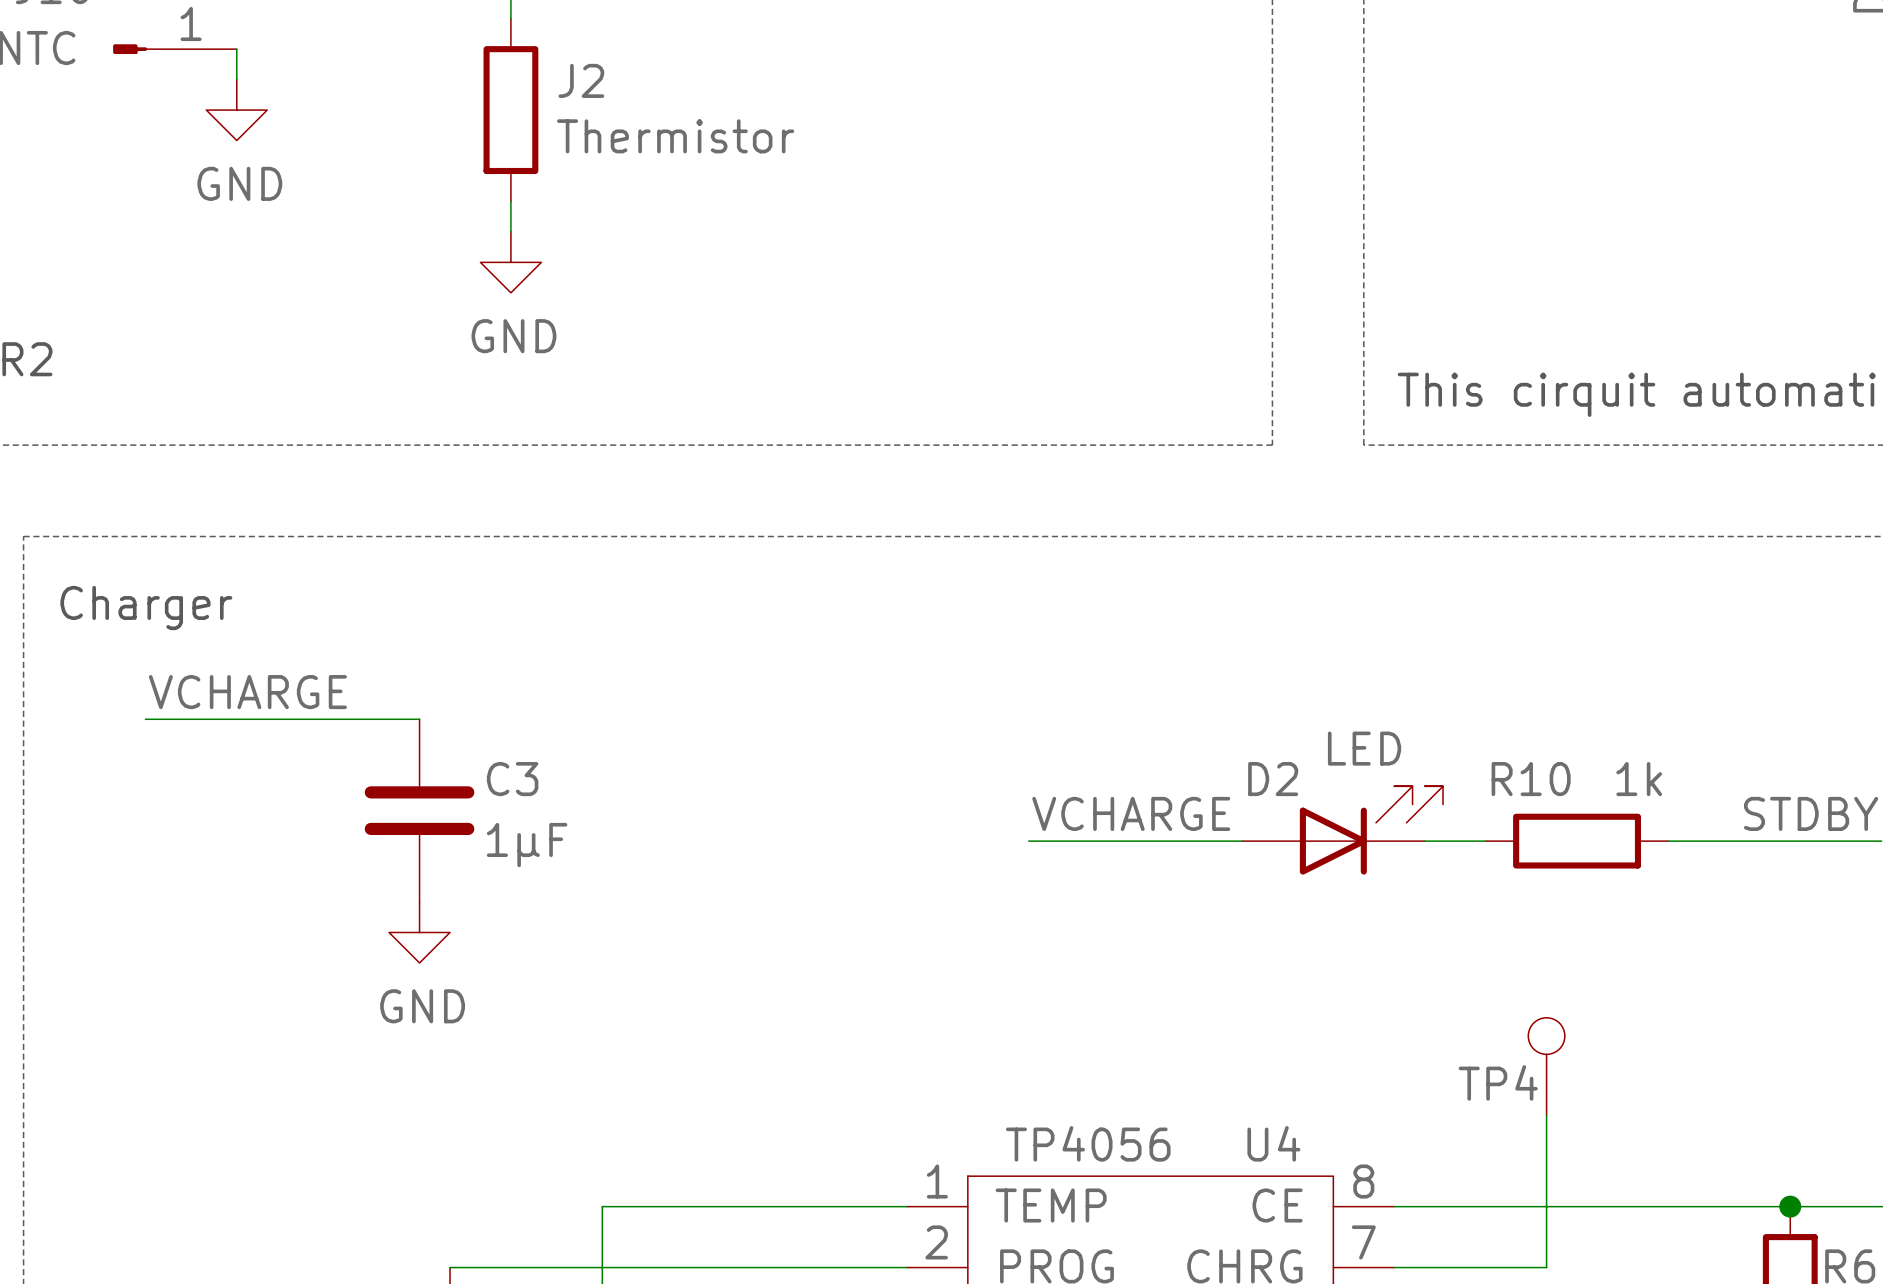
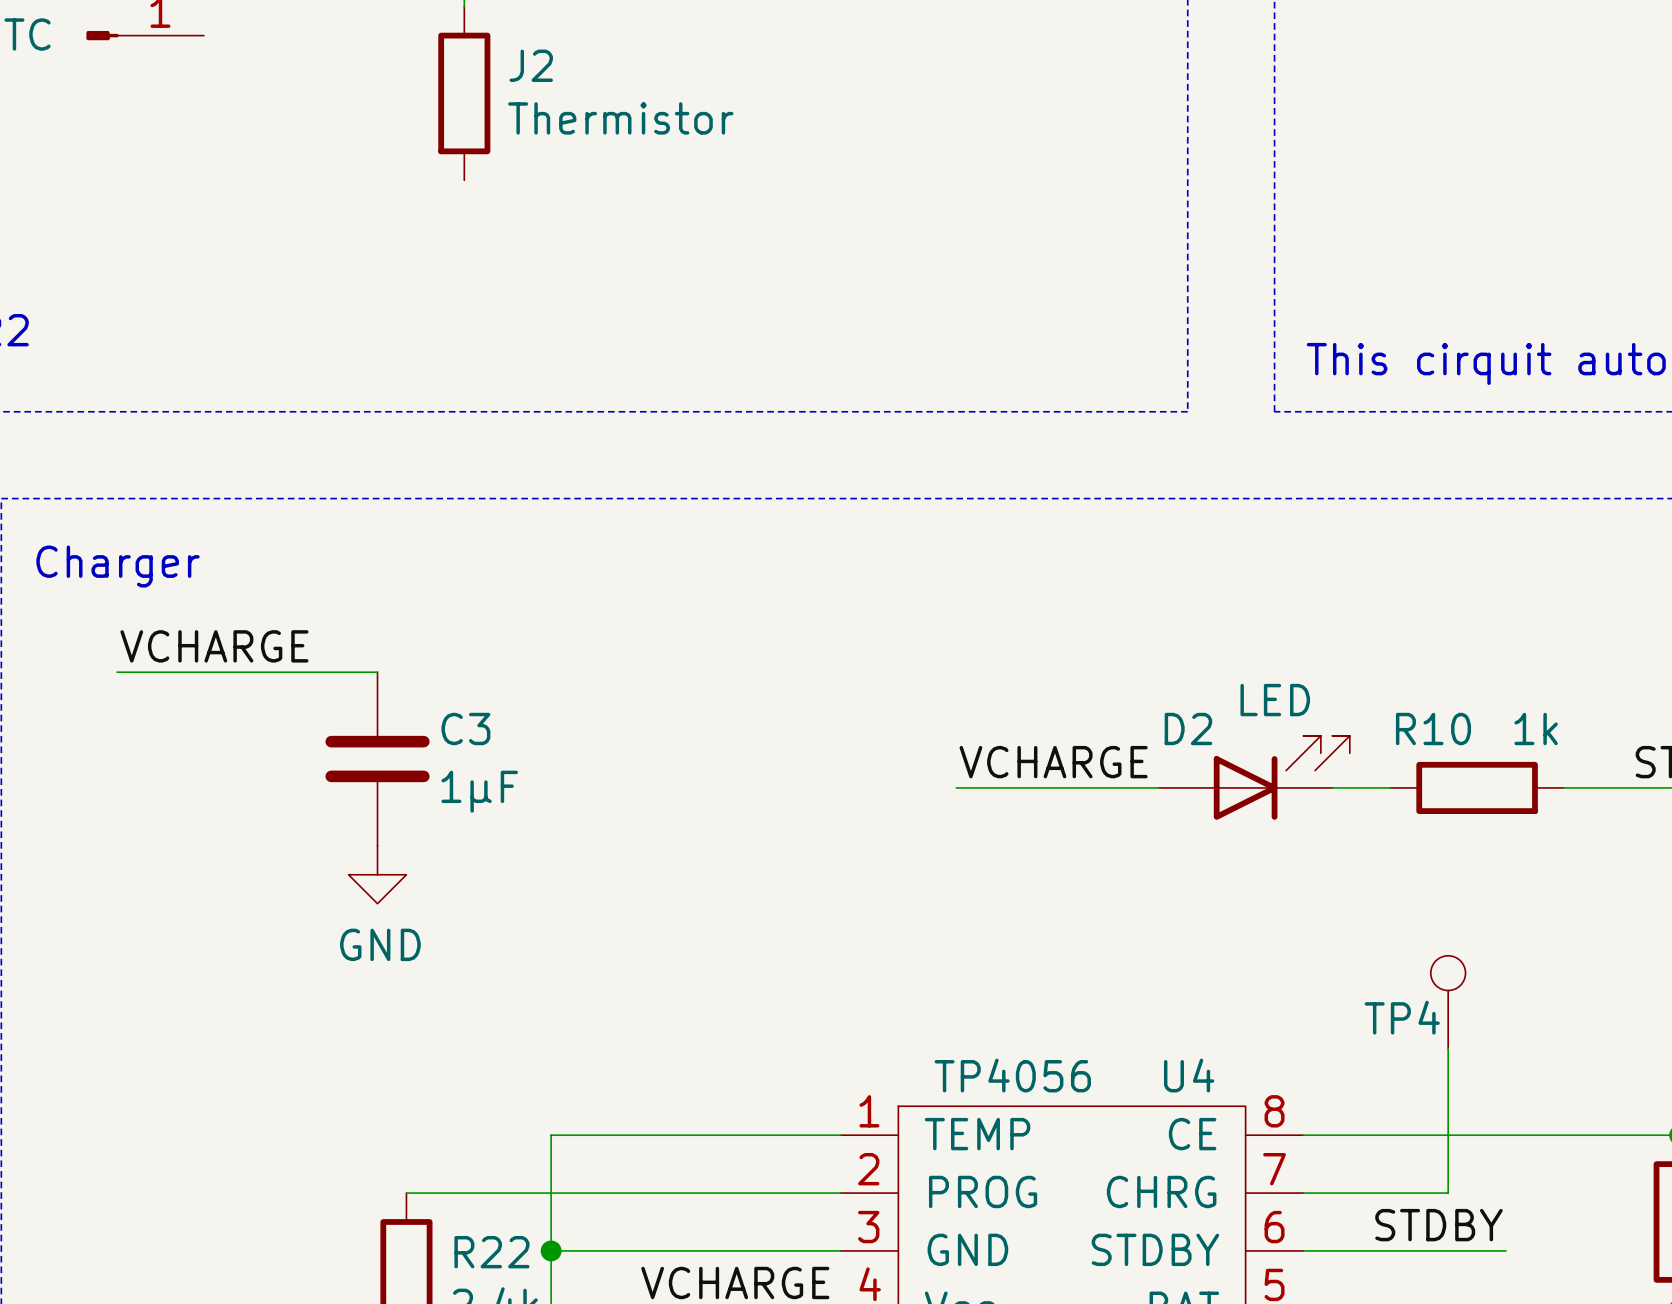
wire: (236, 49) (236, 79) -> none
power symbol: GND (236, 110) -> none
wire: (510, 201) (510, 231) -> none
power symbol: GND (510, 262) -> none

